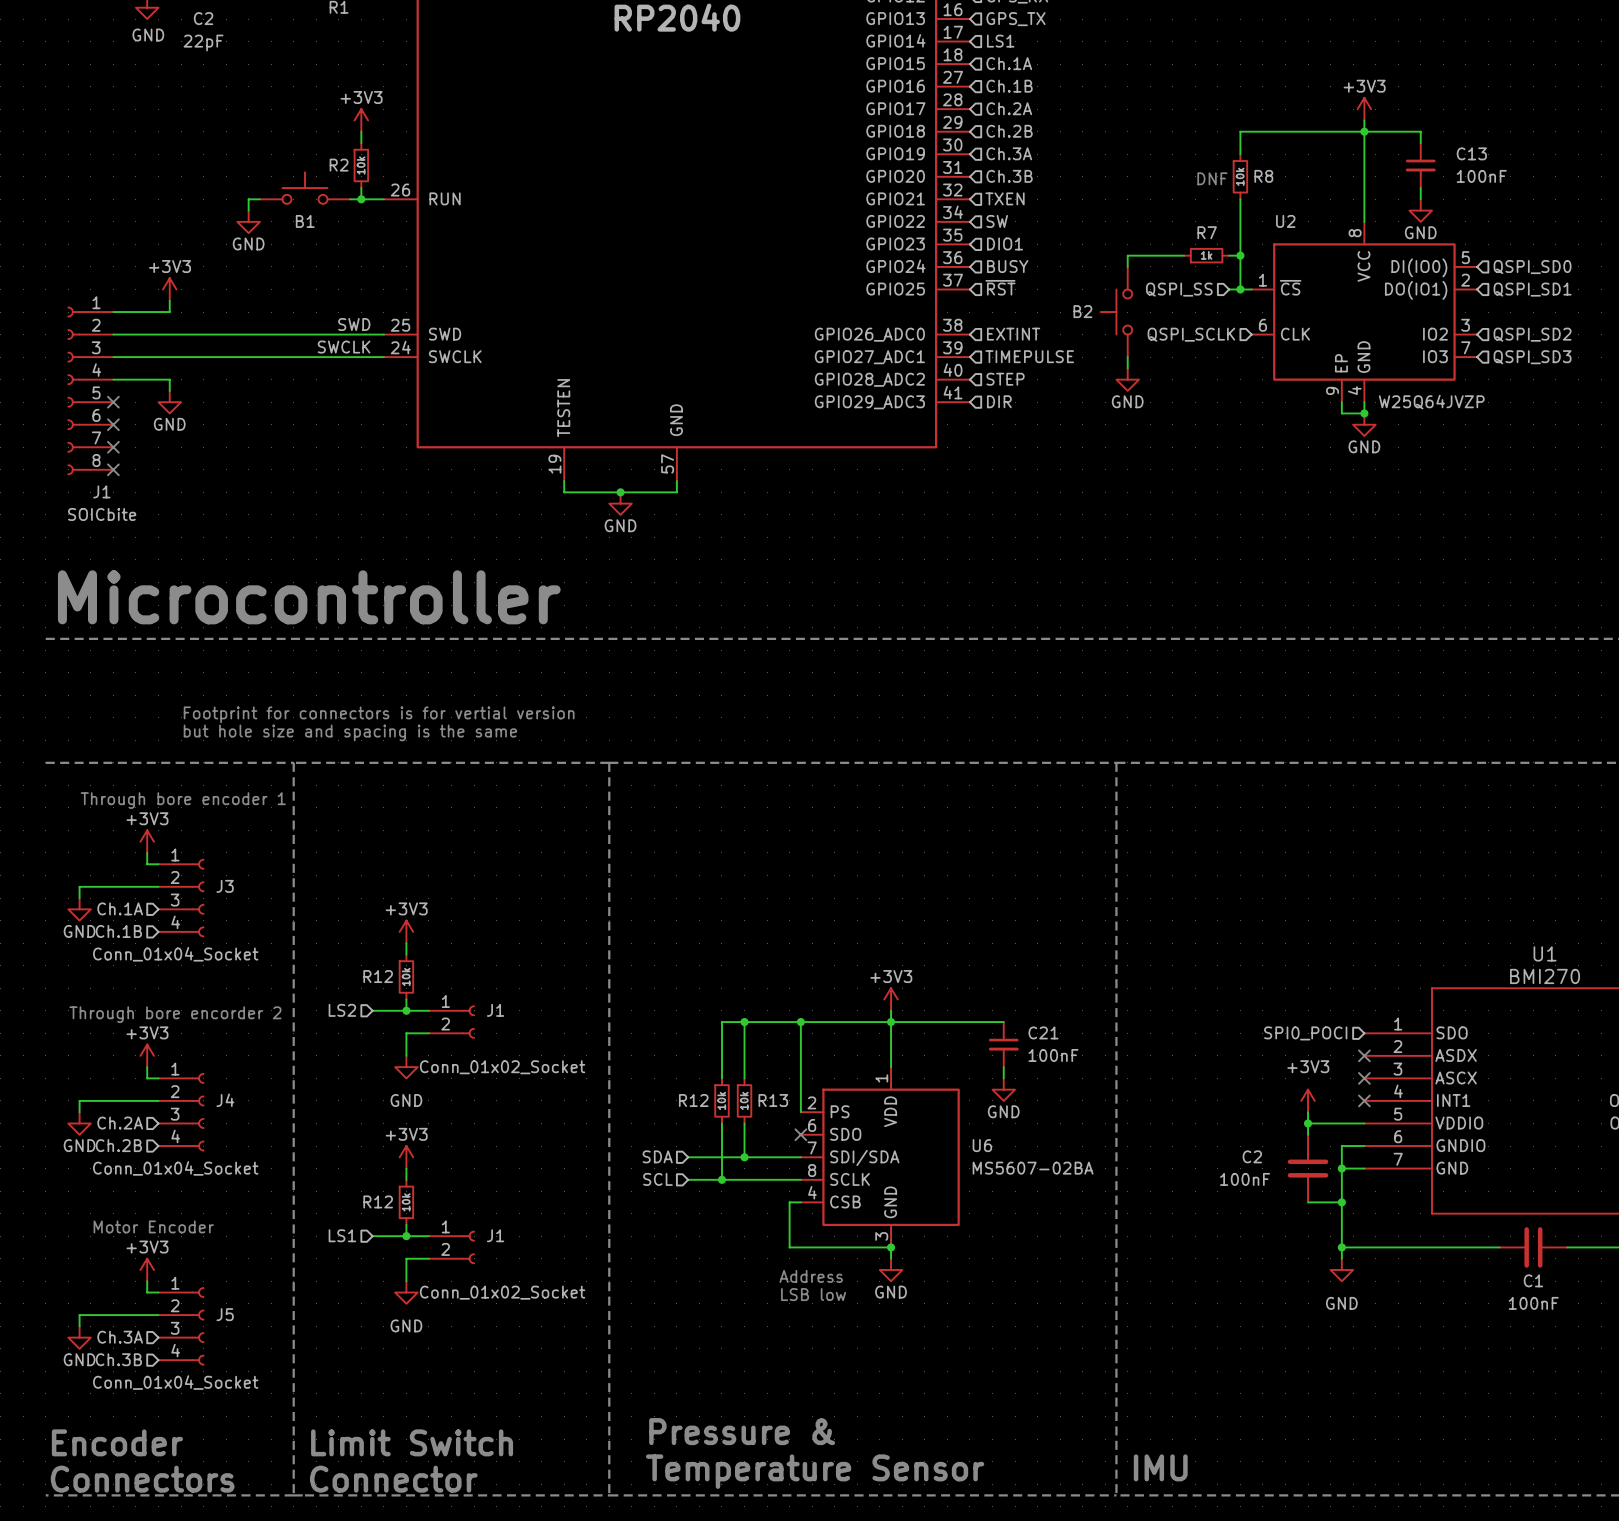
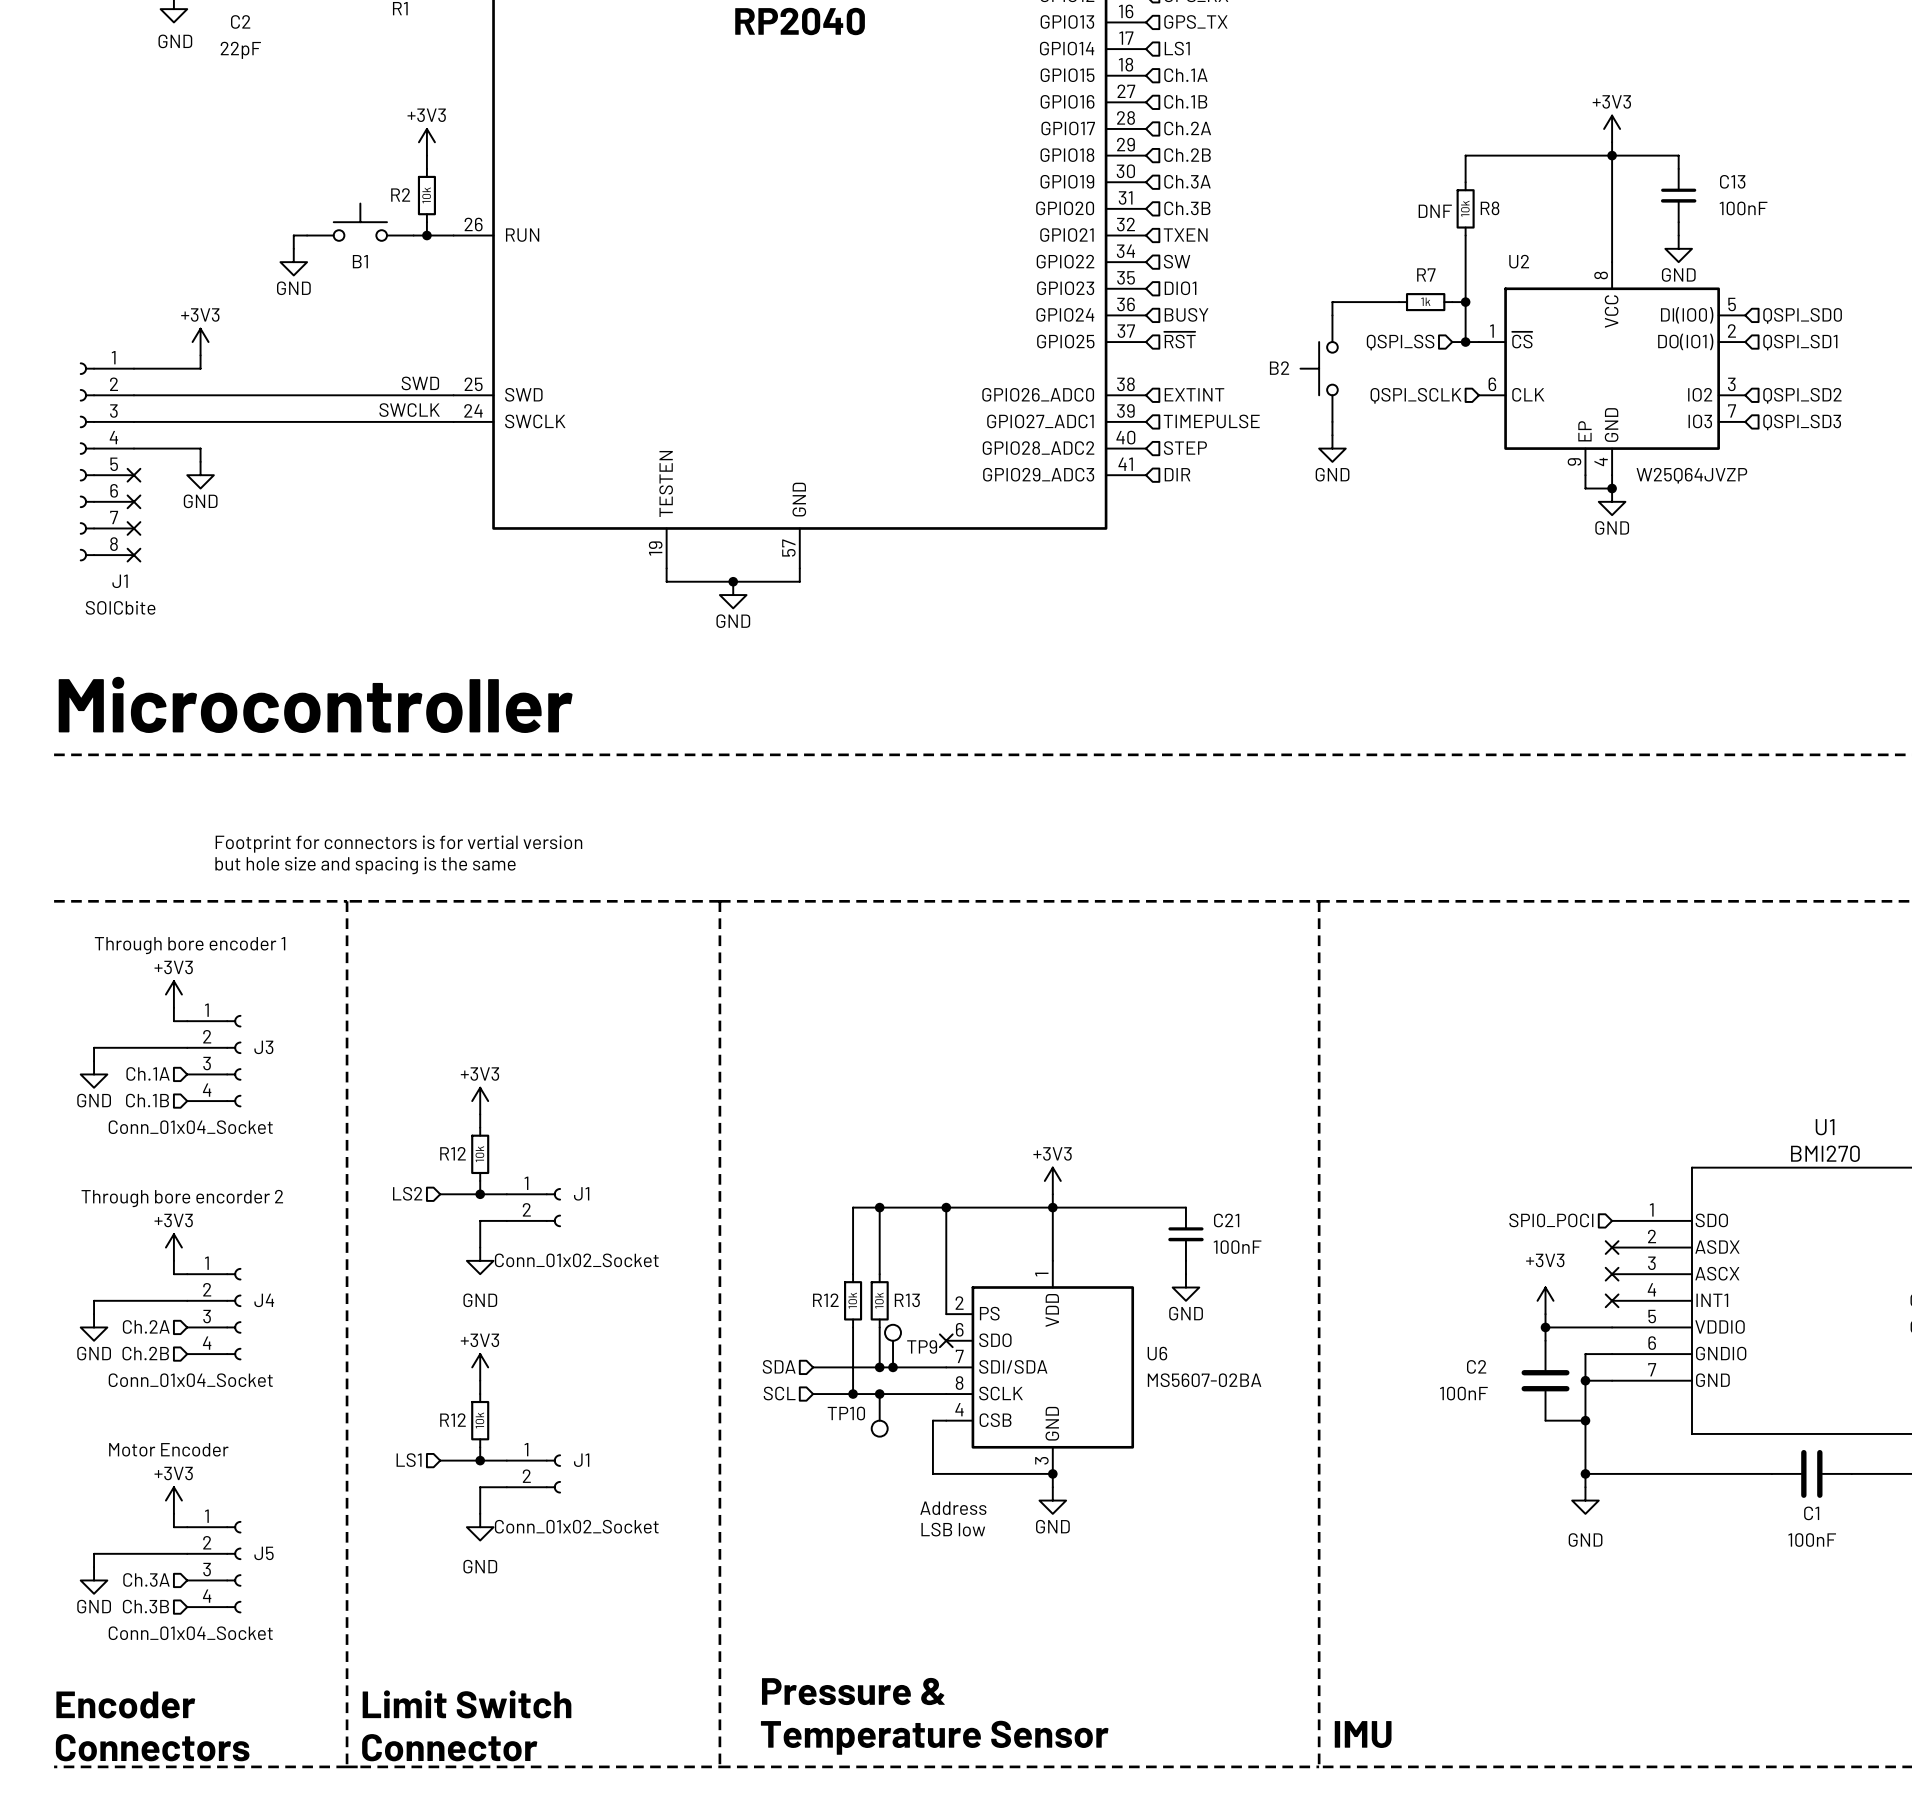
TP9: none -> (893, 1346)
junction: none -> (893, 1367)
junction: none -> (879, 1394)
TP10: none -> (879, 1415)

